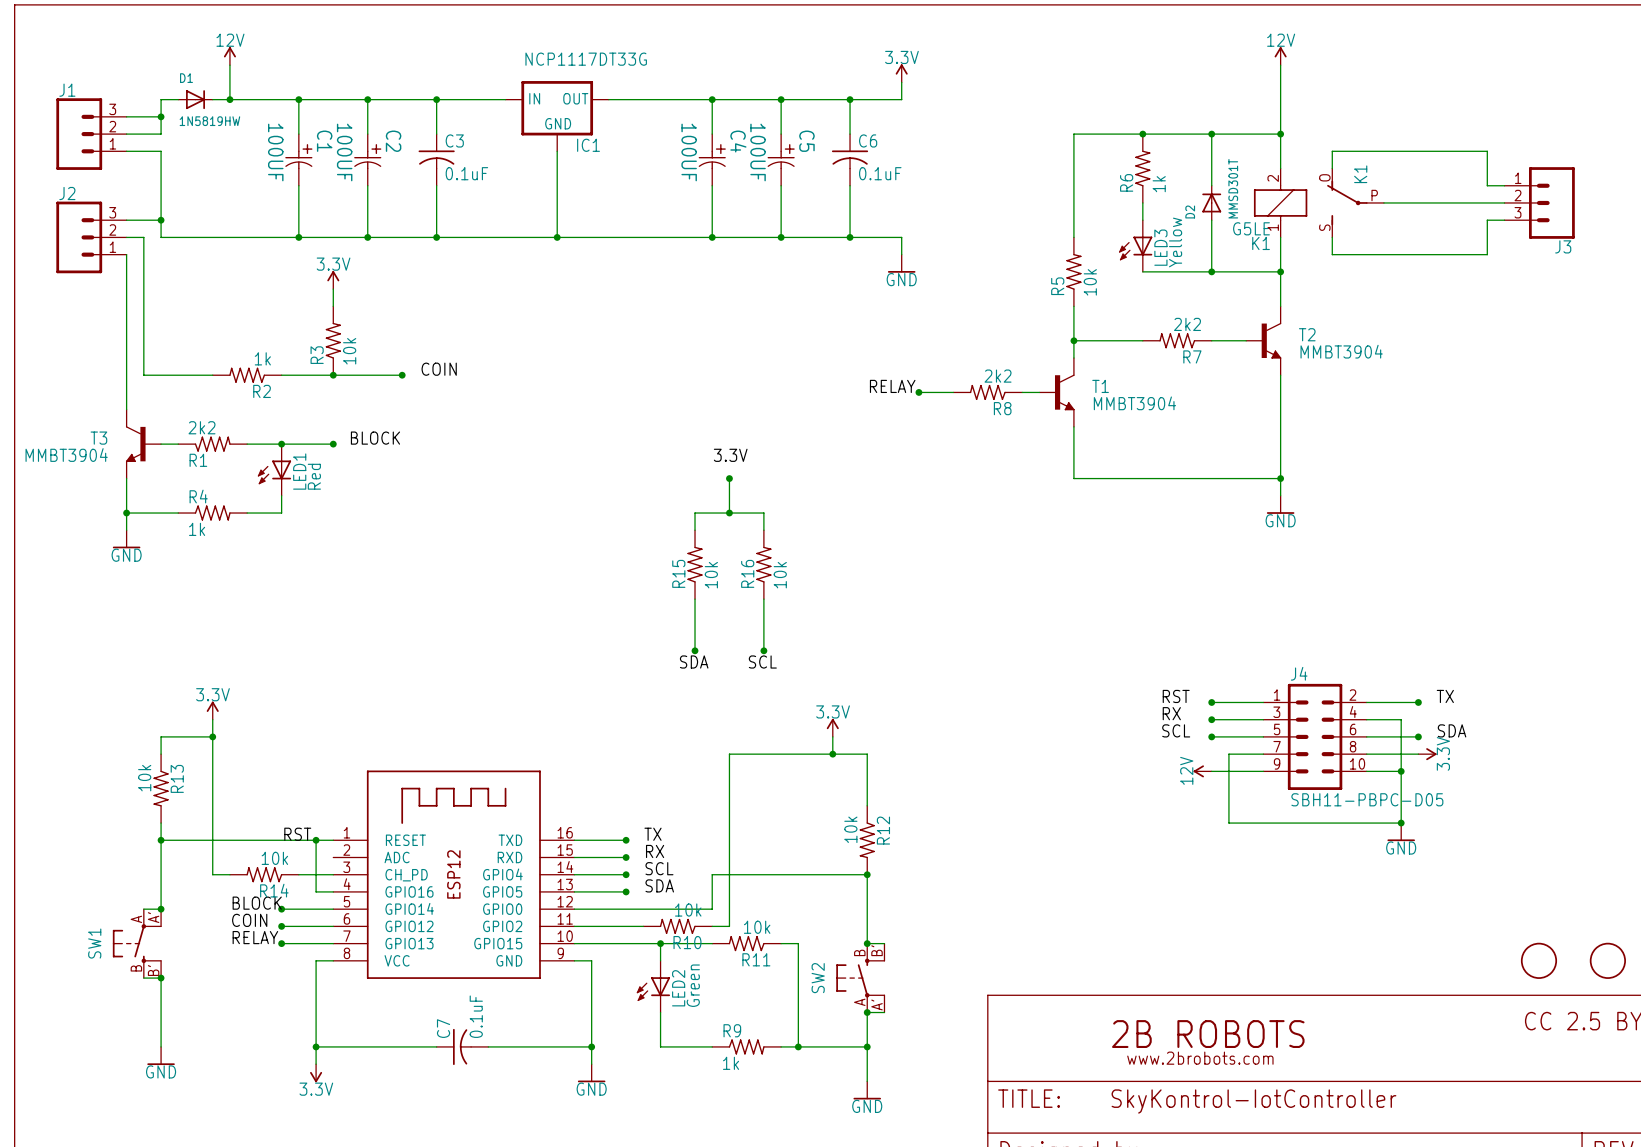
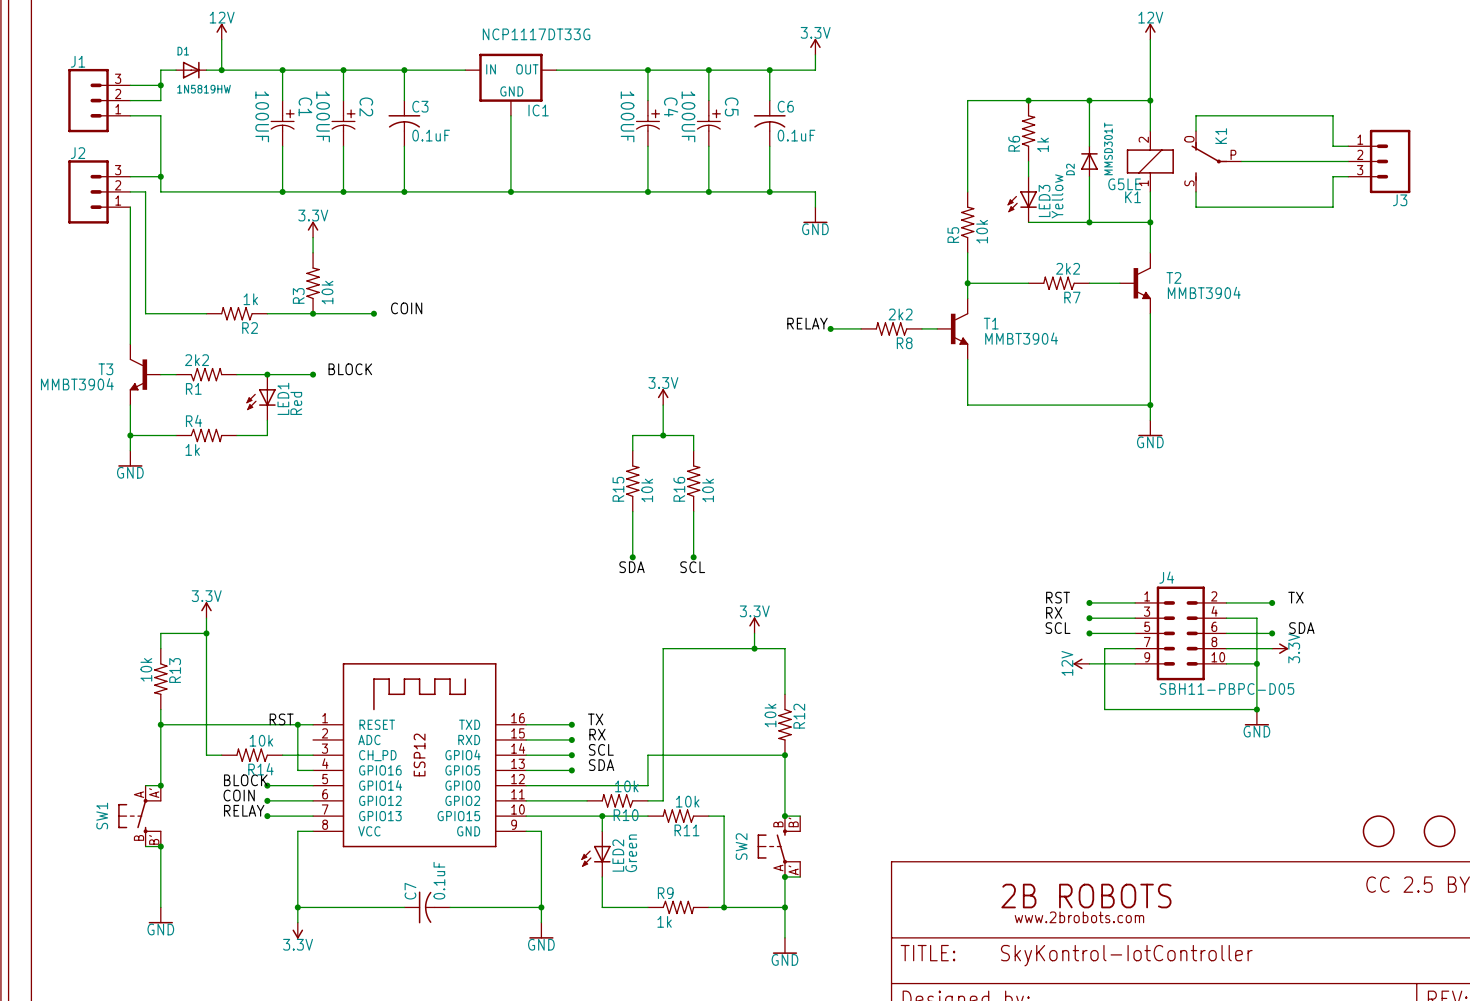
label: 3.3V (730, 455) -> none
power symbol: none -> 3.3V (663, 397)
junction: (729, 478) -> none

